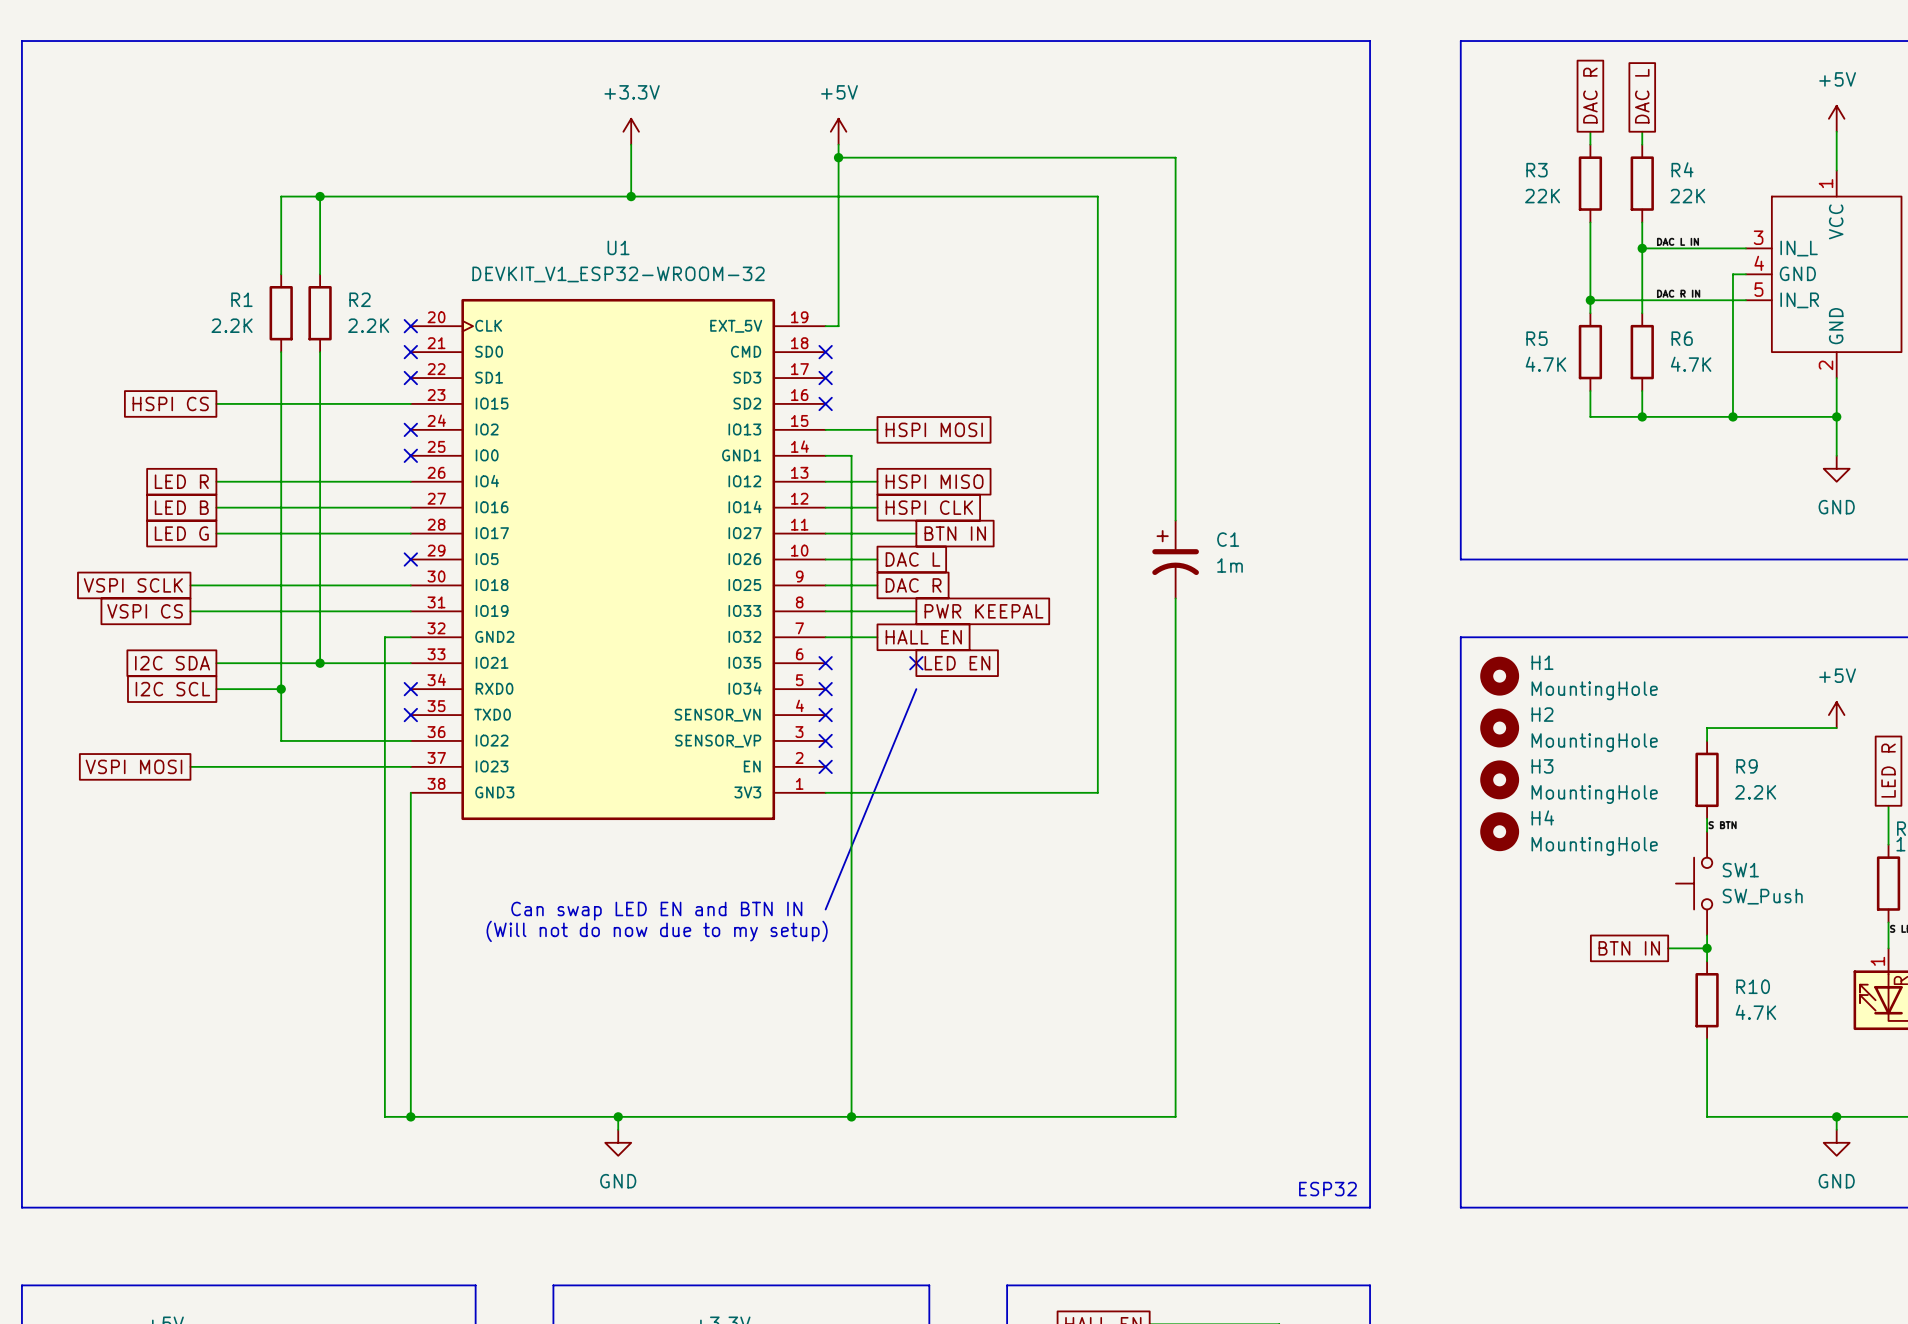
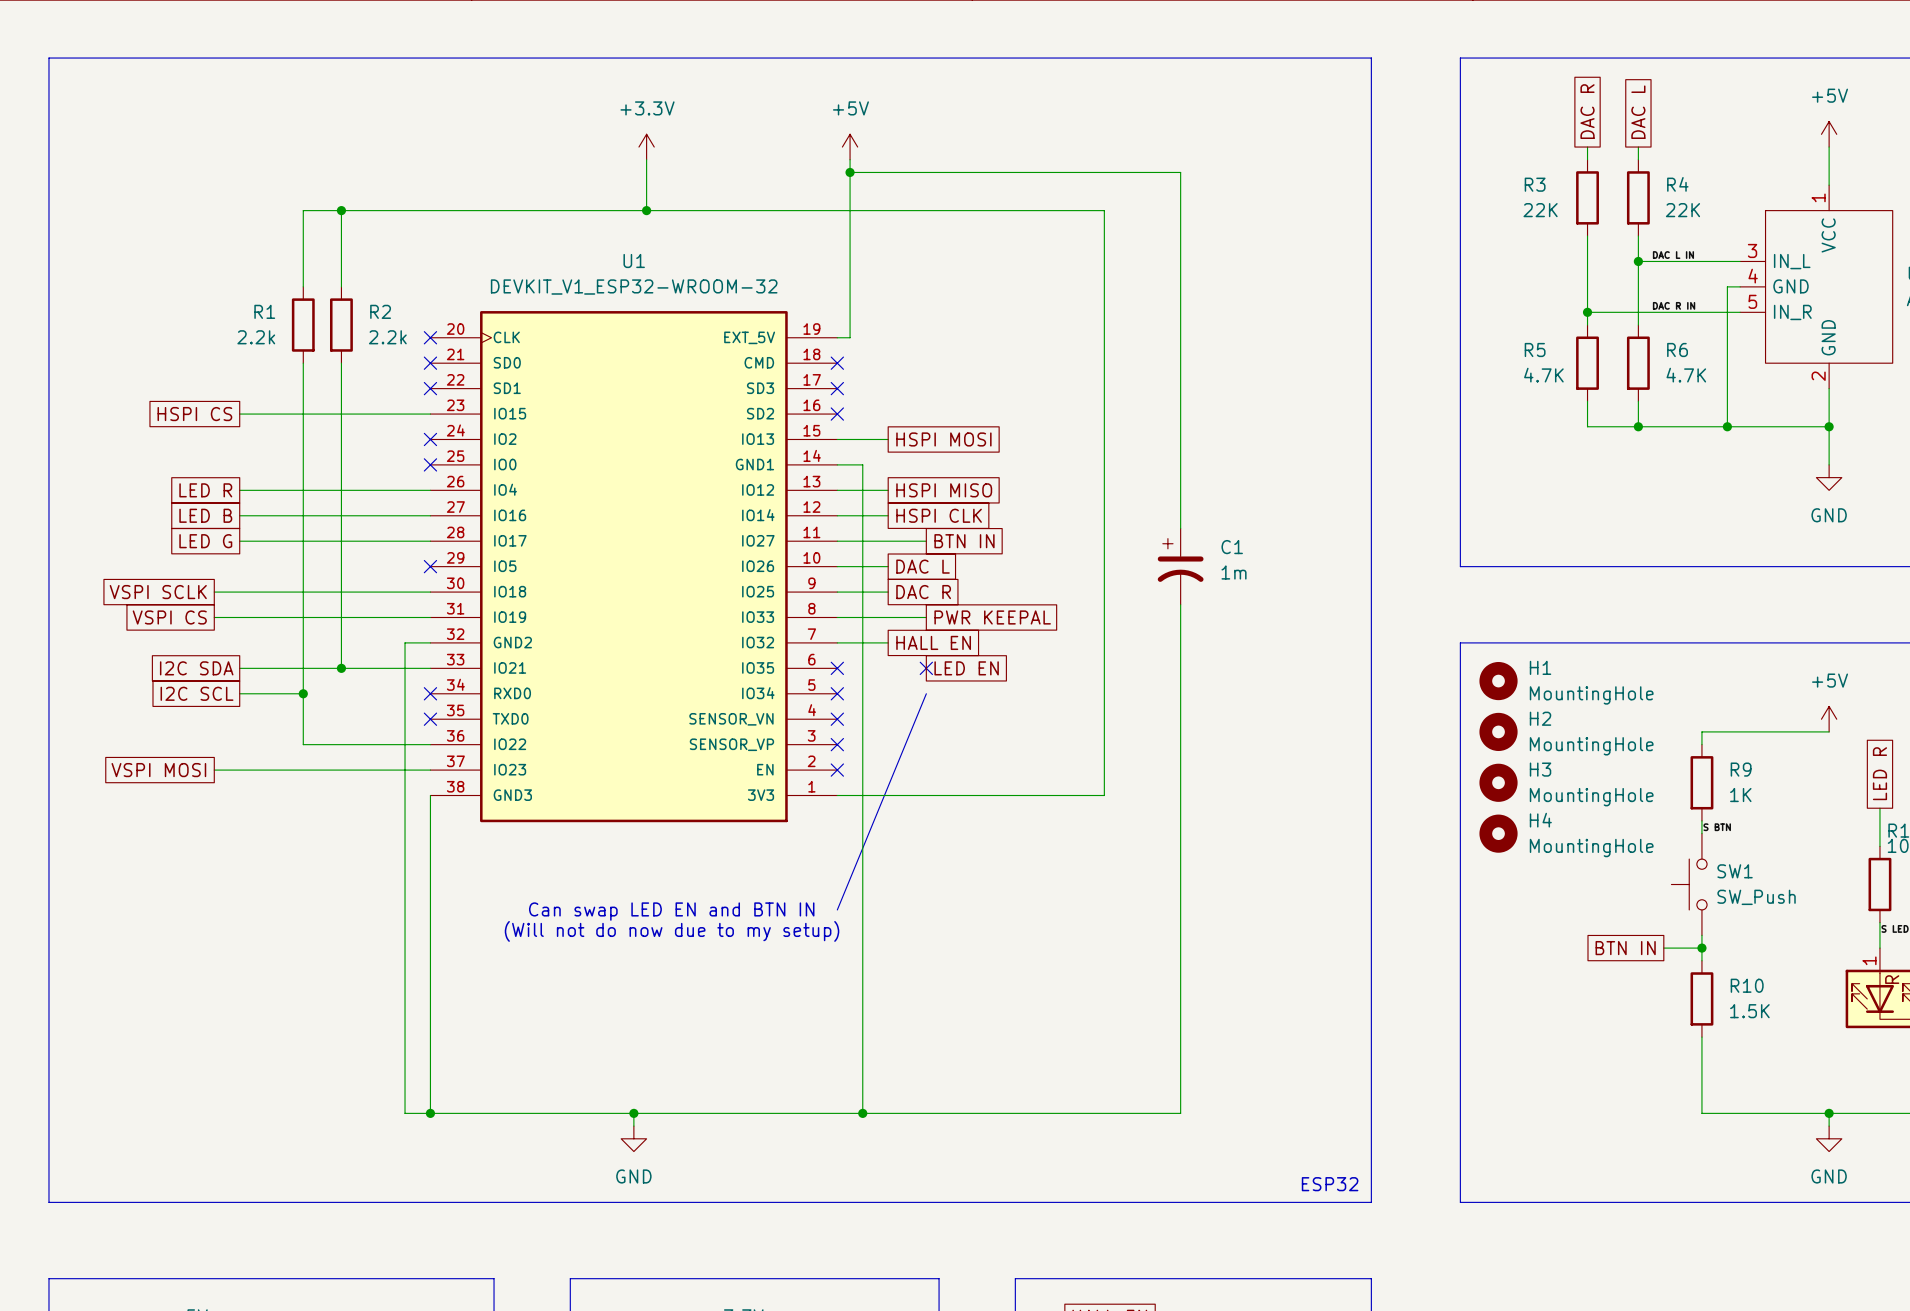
R1 value: 2.2K (232, 325) -> 2.2k (256, 337)
R2 value: 2.2K (368, 325) -> 2.2k (387, 337)
R9 value: 2.2K (1755, 792) -> 1K (1740, 795)
R10 value: 4.7K (1755, 1012) -> 1.5K (1749, 1011)

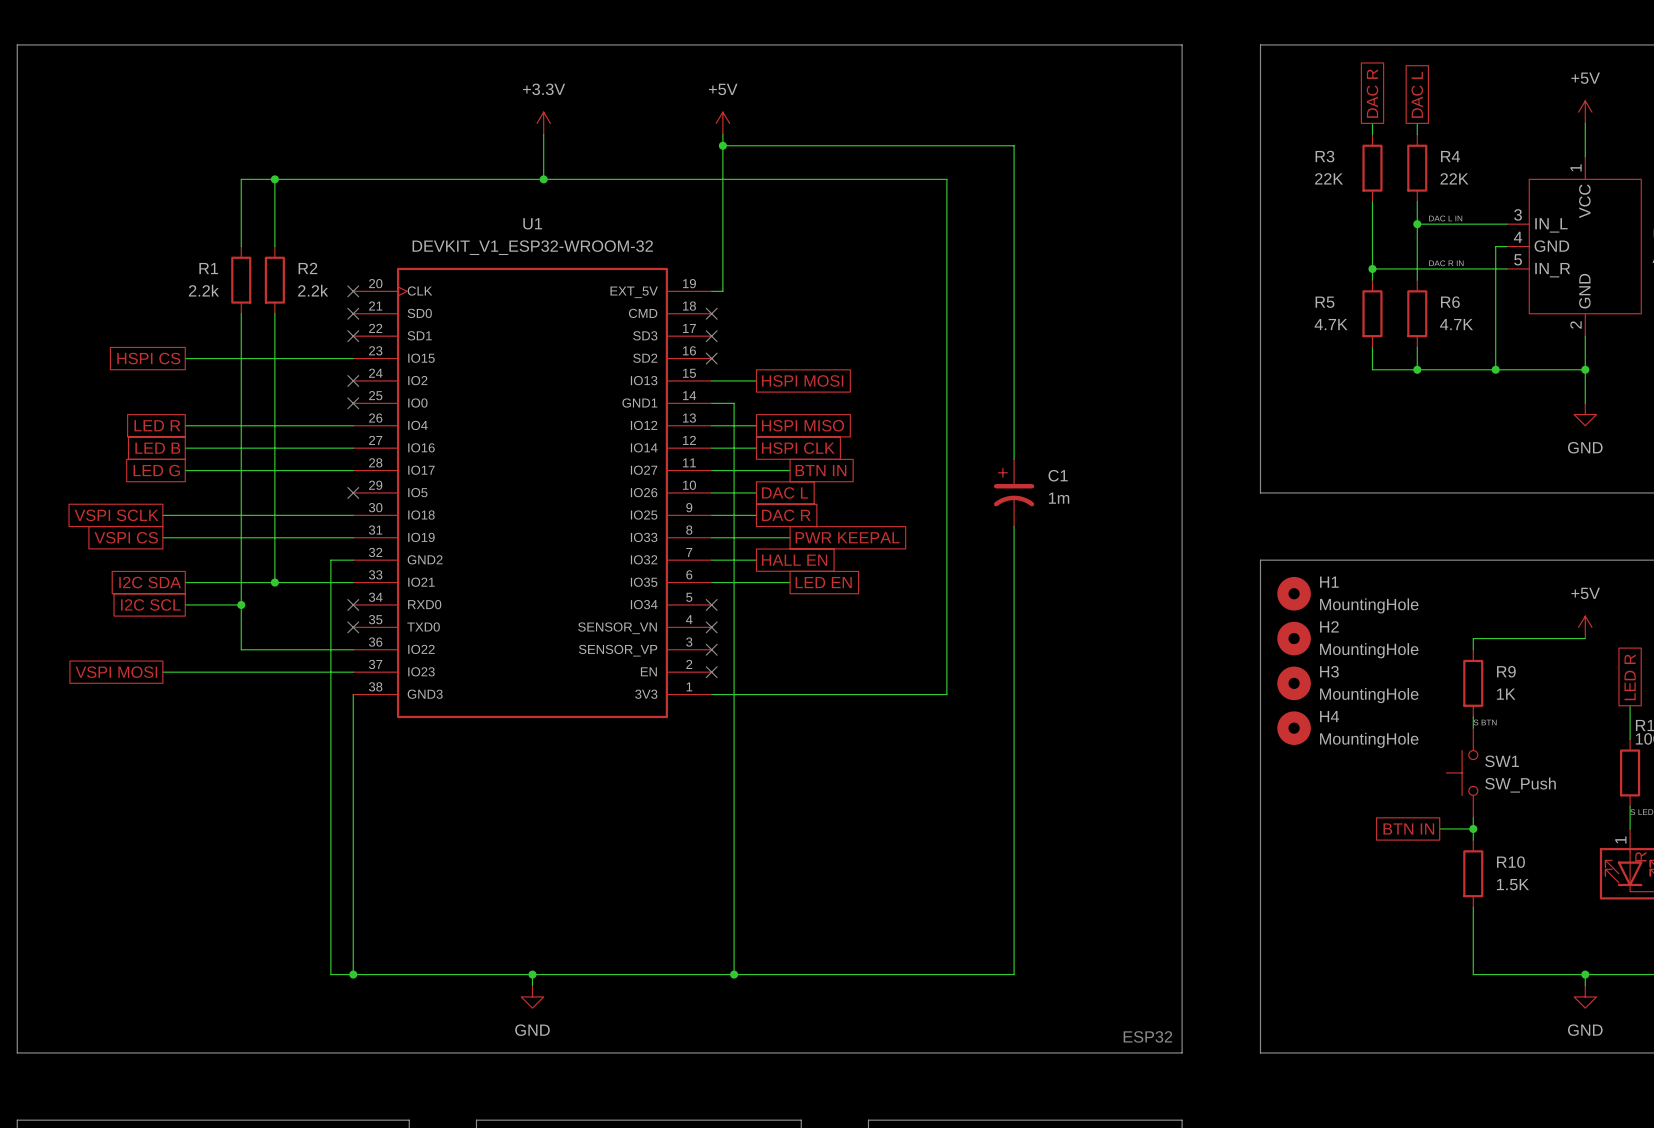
wire: none -> (711, 582) (790, 582)
no-connect mark: (837, 668) -> none
no-connect mark: (926, 668) -> none
line: (926, 693) (837, 909) -> none
text: Can swap LED EN and BTN IN (671, 911) -> none
text: (Will not do now due to my setup) (672, 931) -> none

